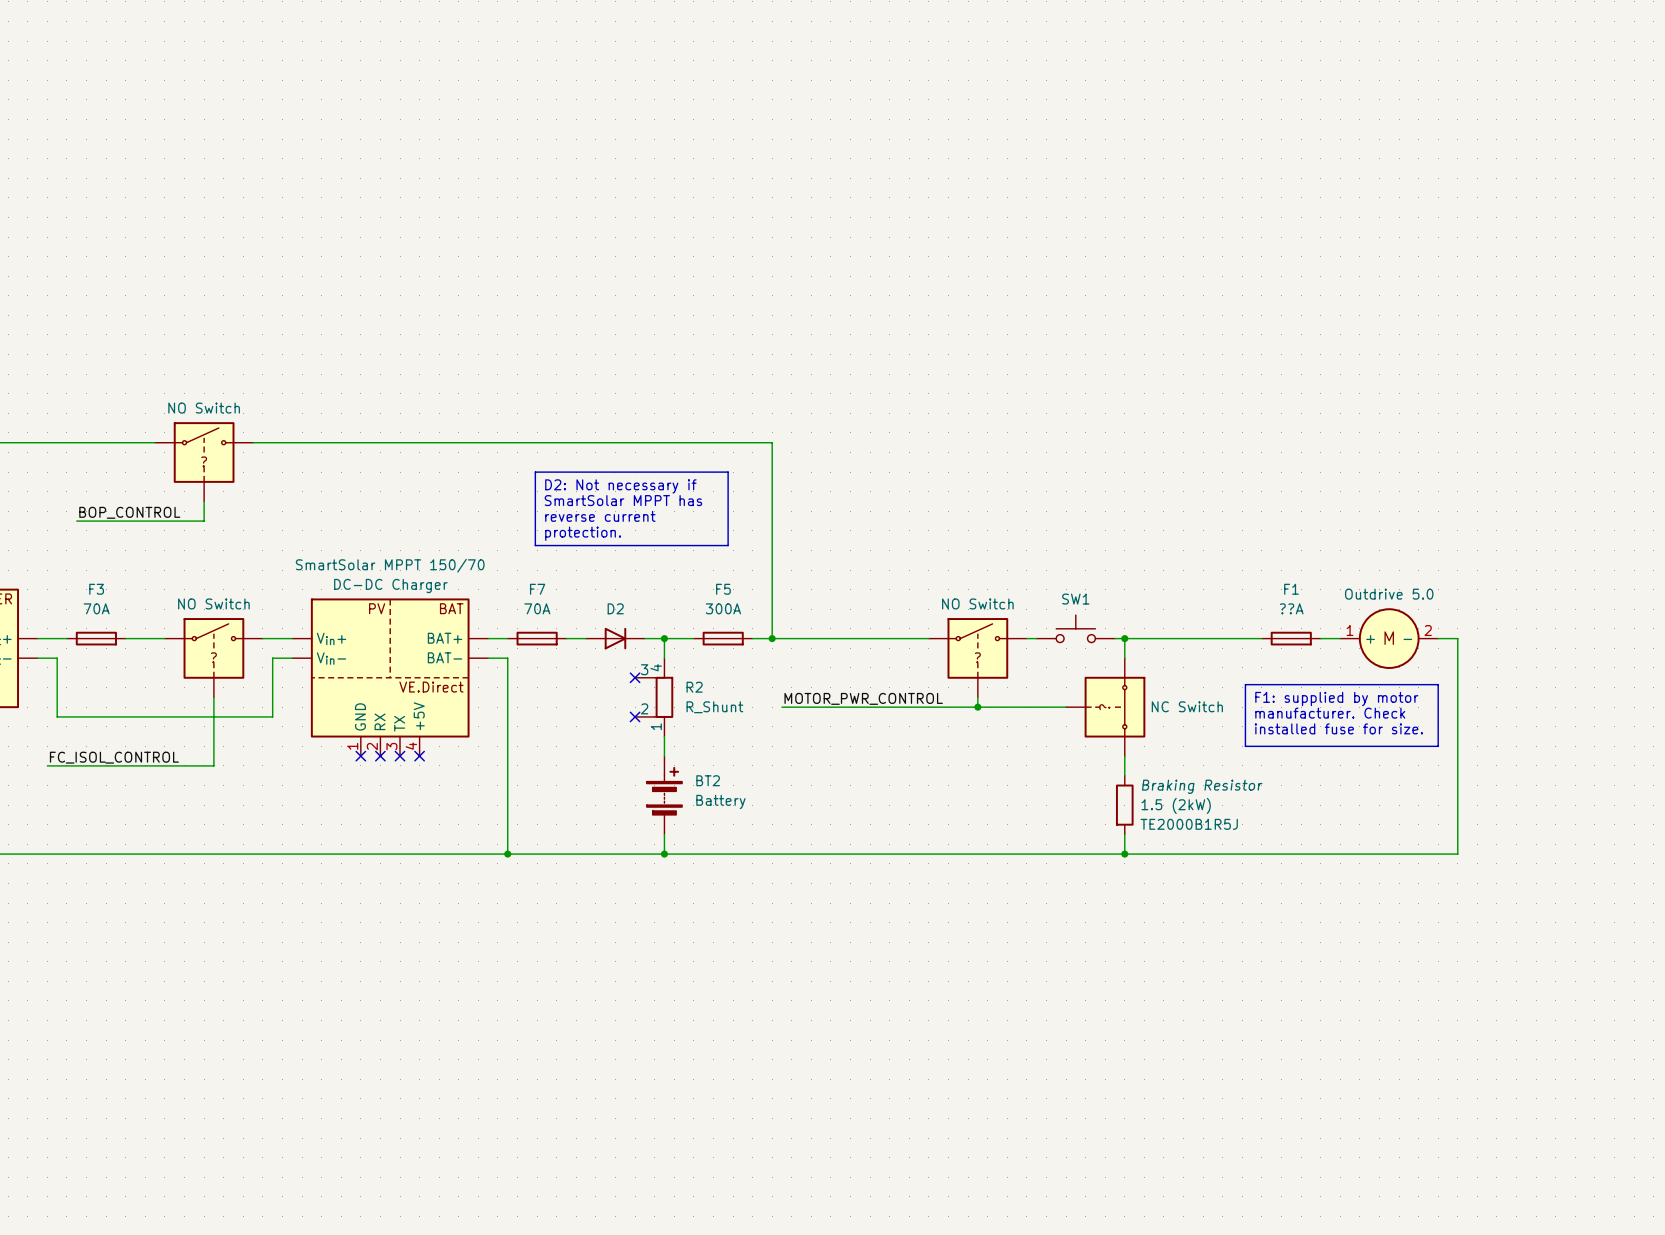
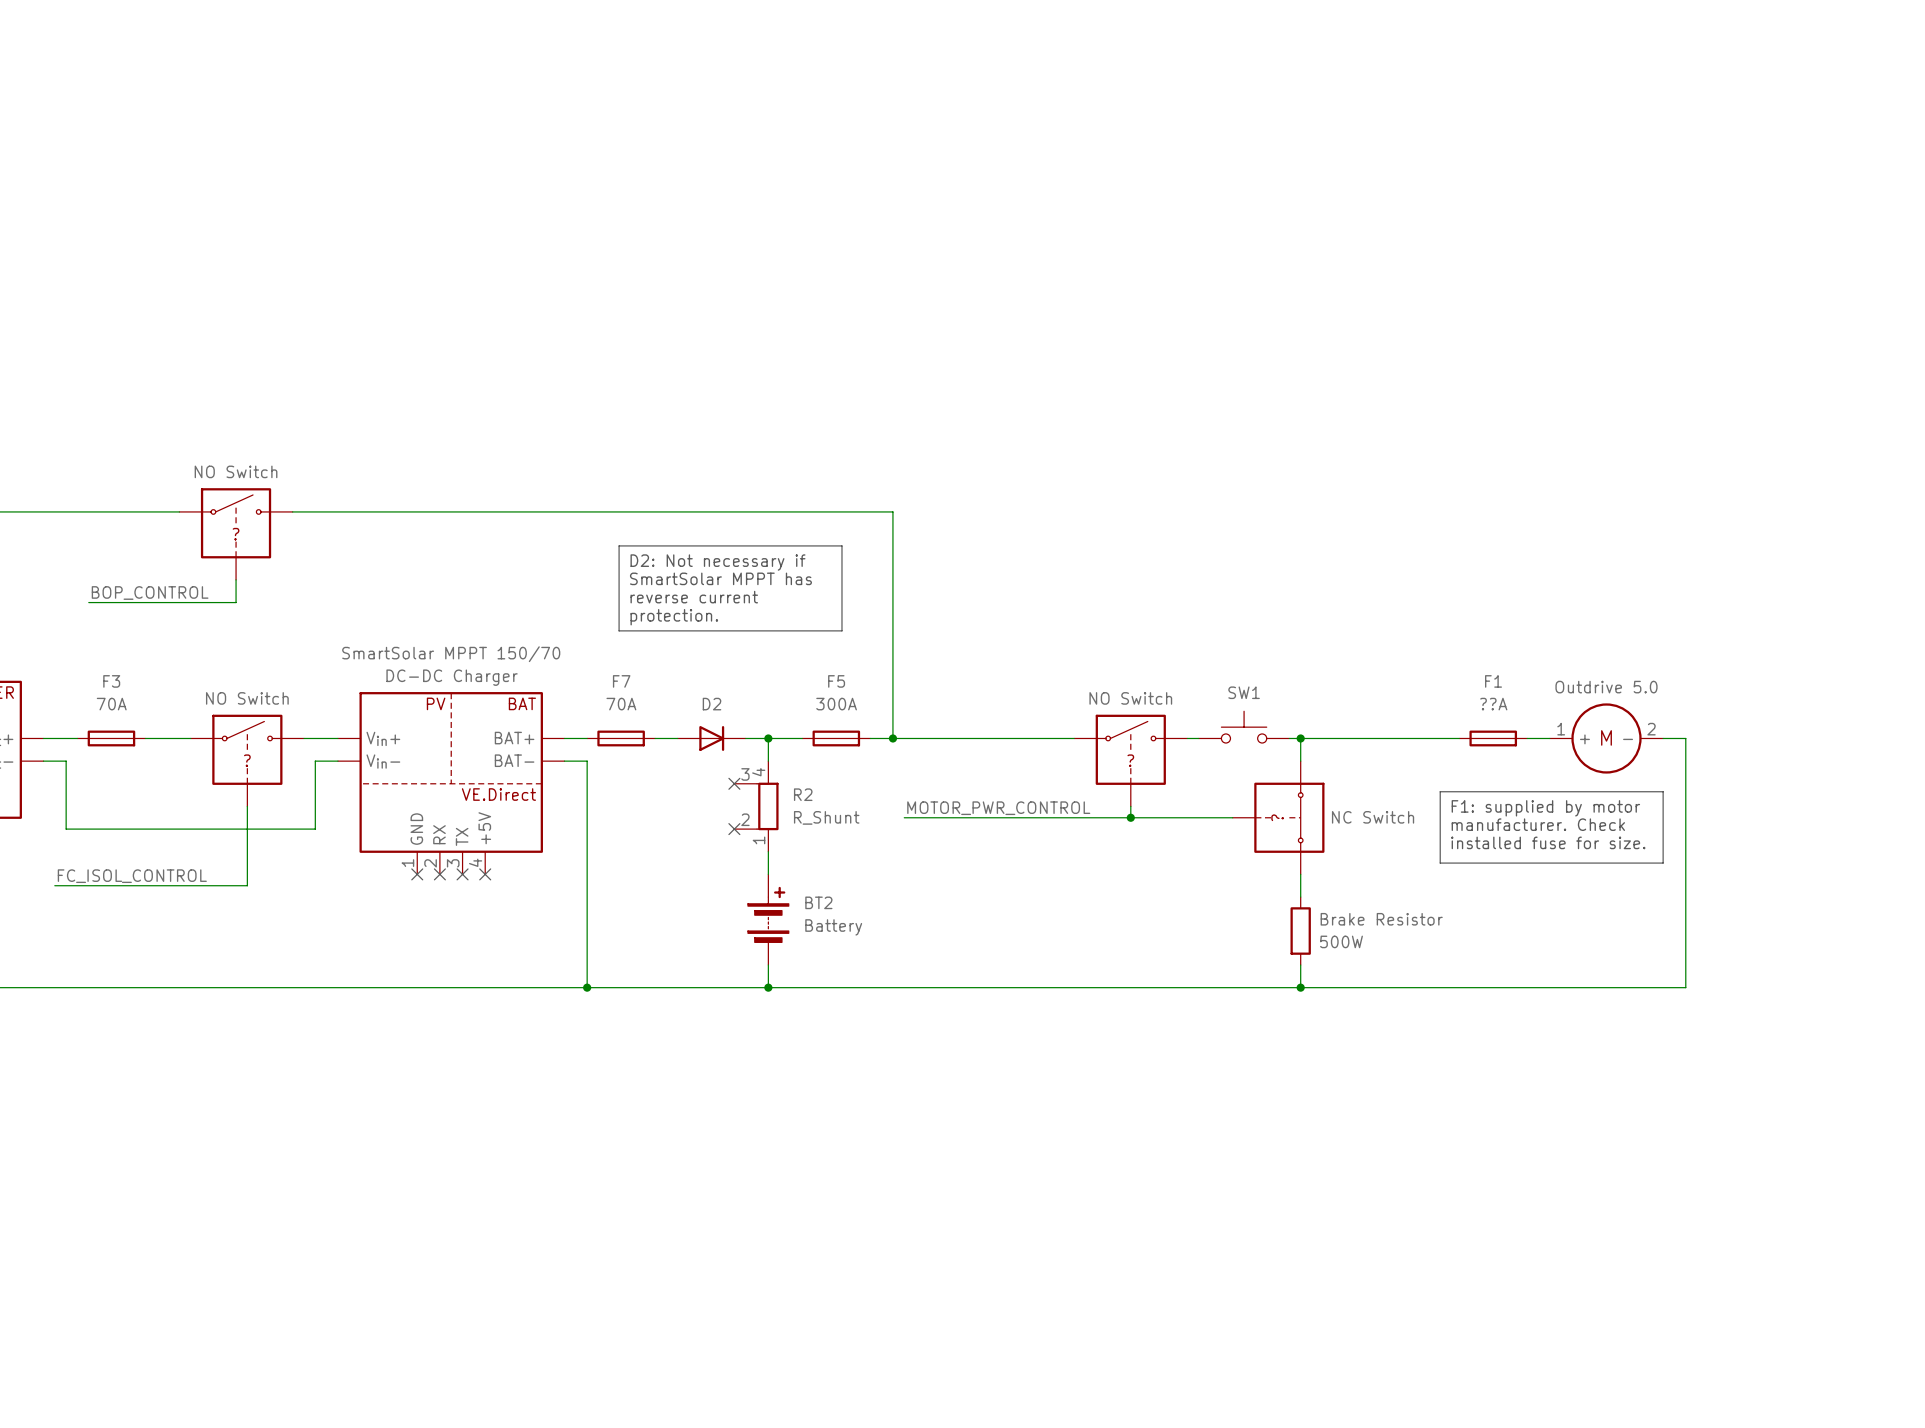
part text: Braking Resistor (1202, 786) -> Brake Resistor (1381, 919)
part value: 1.5 (2kW) (1176, 805) -> 500W (1341, 941)
part text: TE2000B1R5J (1189, 824) -> none

